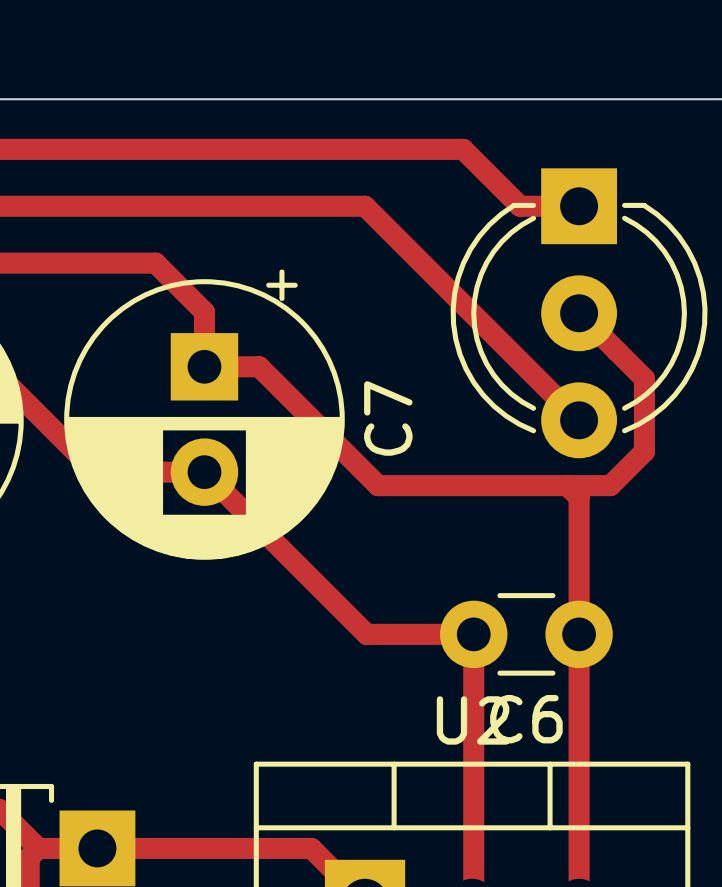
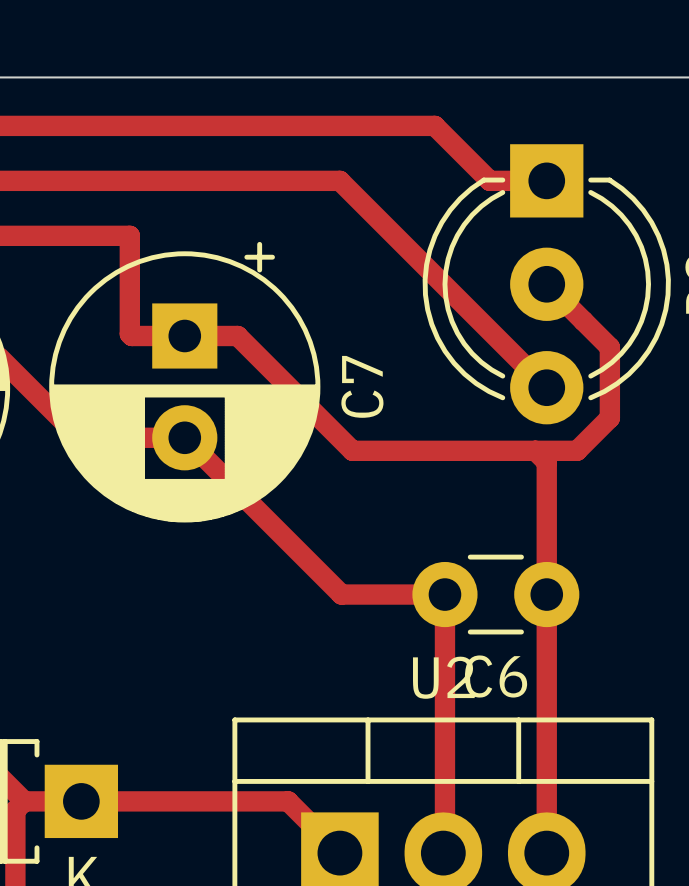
track: (147, 263) (155, 263) (204, 312) (204, 366) -> (129, 235) (129, 333) (131, 335) (184, 335)

